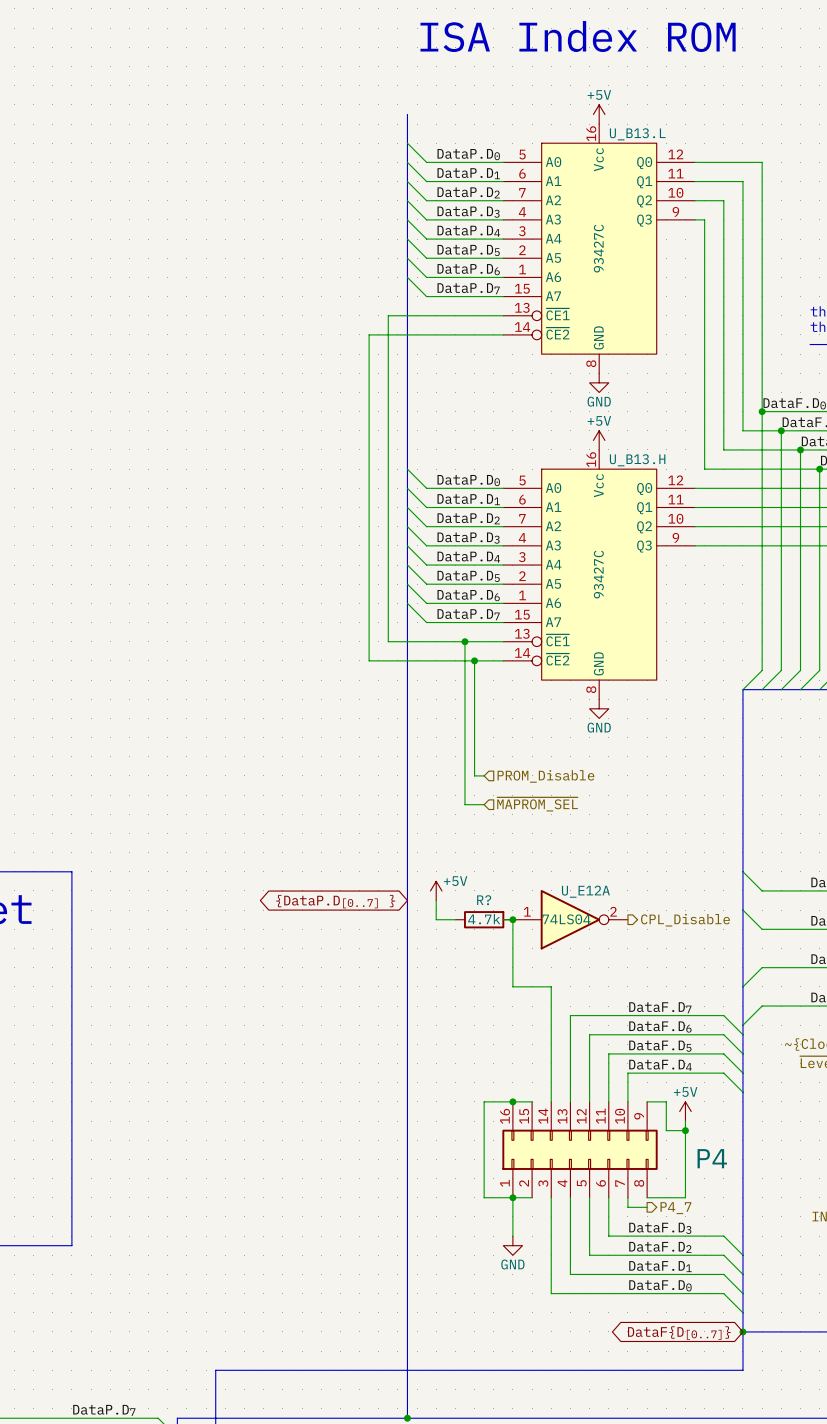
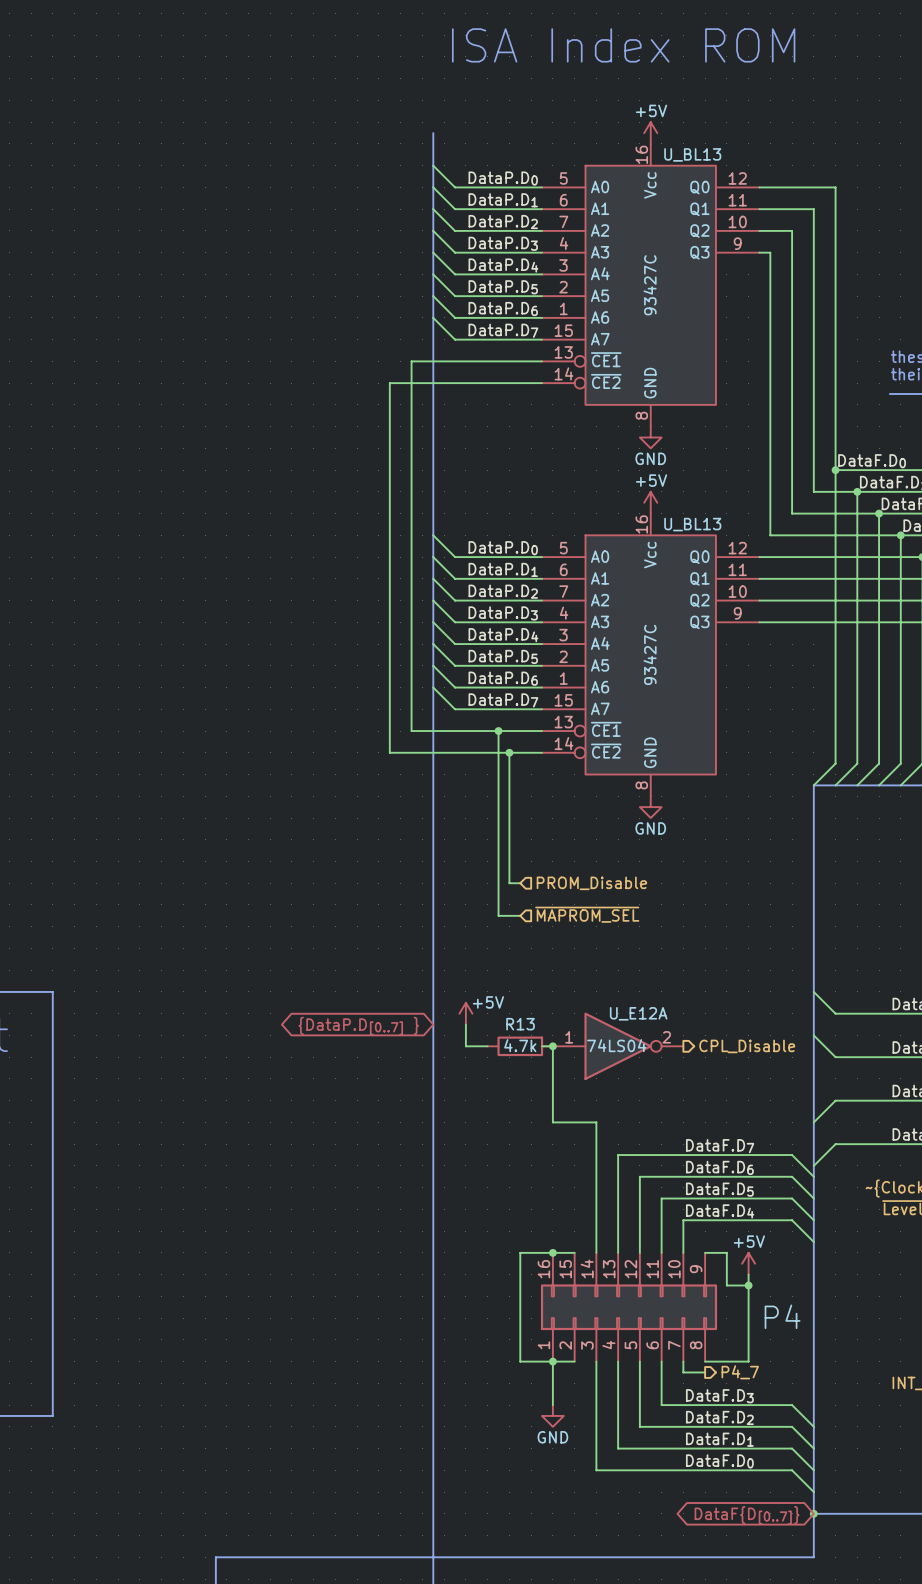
U_B13.L name: U_B13.L (637, 134) -> U_BL13 (692, 154)
U_B13.H name: U_B13.H (637, 460) -> U_BL13 (692, 524)
R? name: R? (484, 900) -> R13 (520, 1024)

